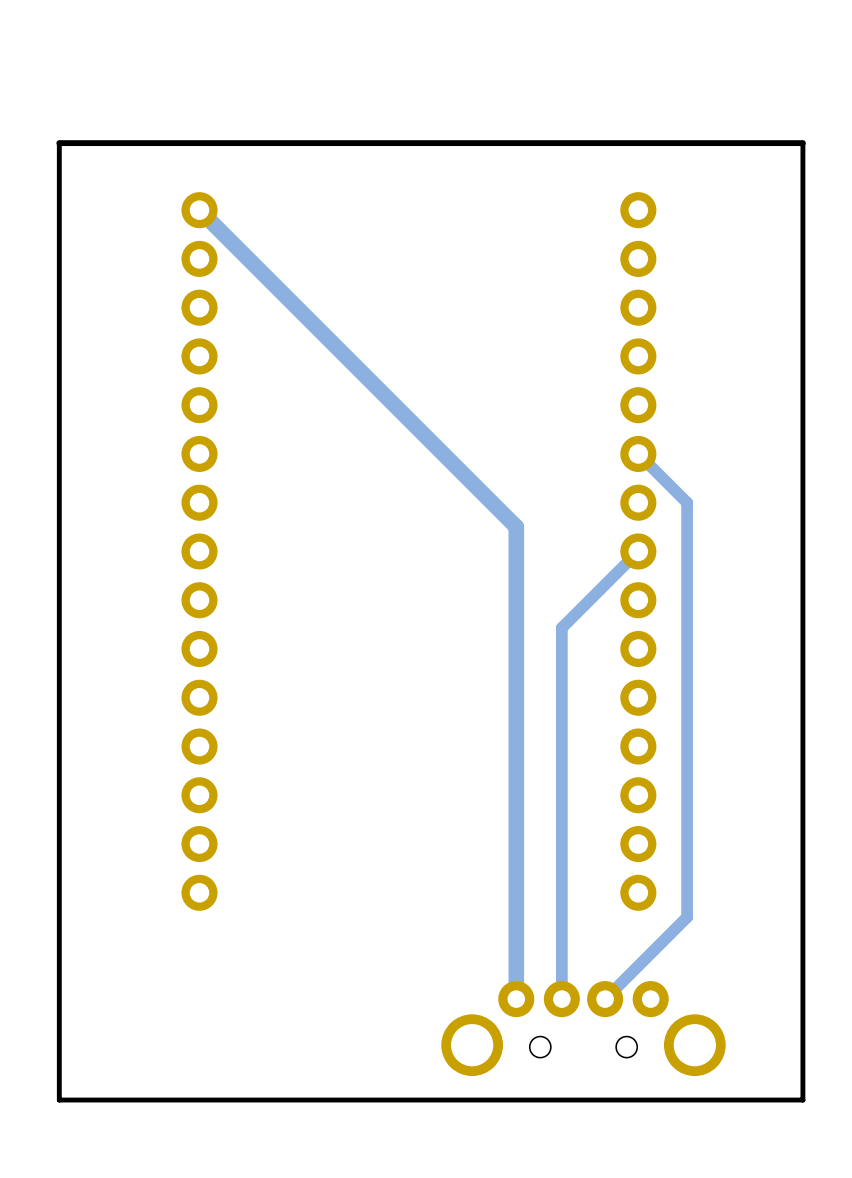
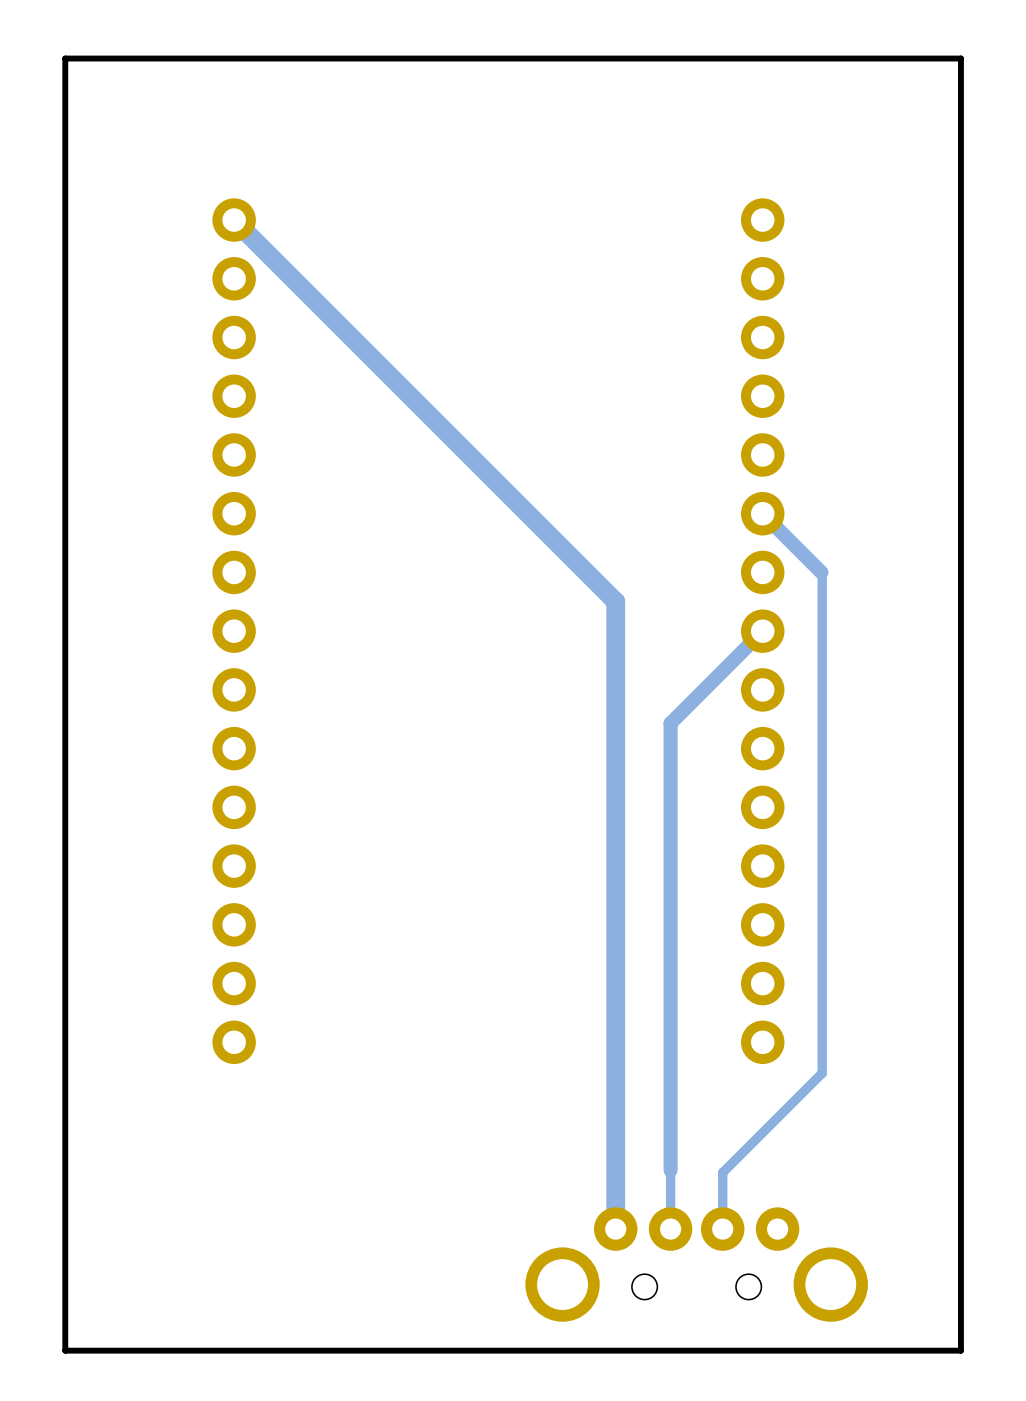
board edge: (802, 143) (59, 143) -> (960, 139) (960, 58) (65, 58) (65, 139)
track: (687, 502) (687, 917) (605, 999) -> (821, 572) (822, 1073) (722, 1172) (722, 1229)
track: none -> (615, 1170) (615, 1229)
track: none -> (670, 1170) (670, 1229)
part position: (583, 1028) -> (696, 1264)
board edge: (802, 1100) (59, 1100) -> (960, 1291) (960, 1350) (65, 1350) (65, 1291)

